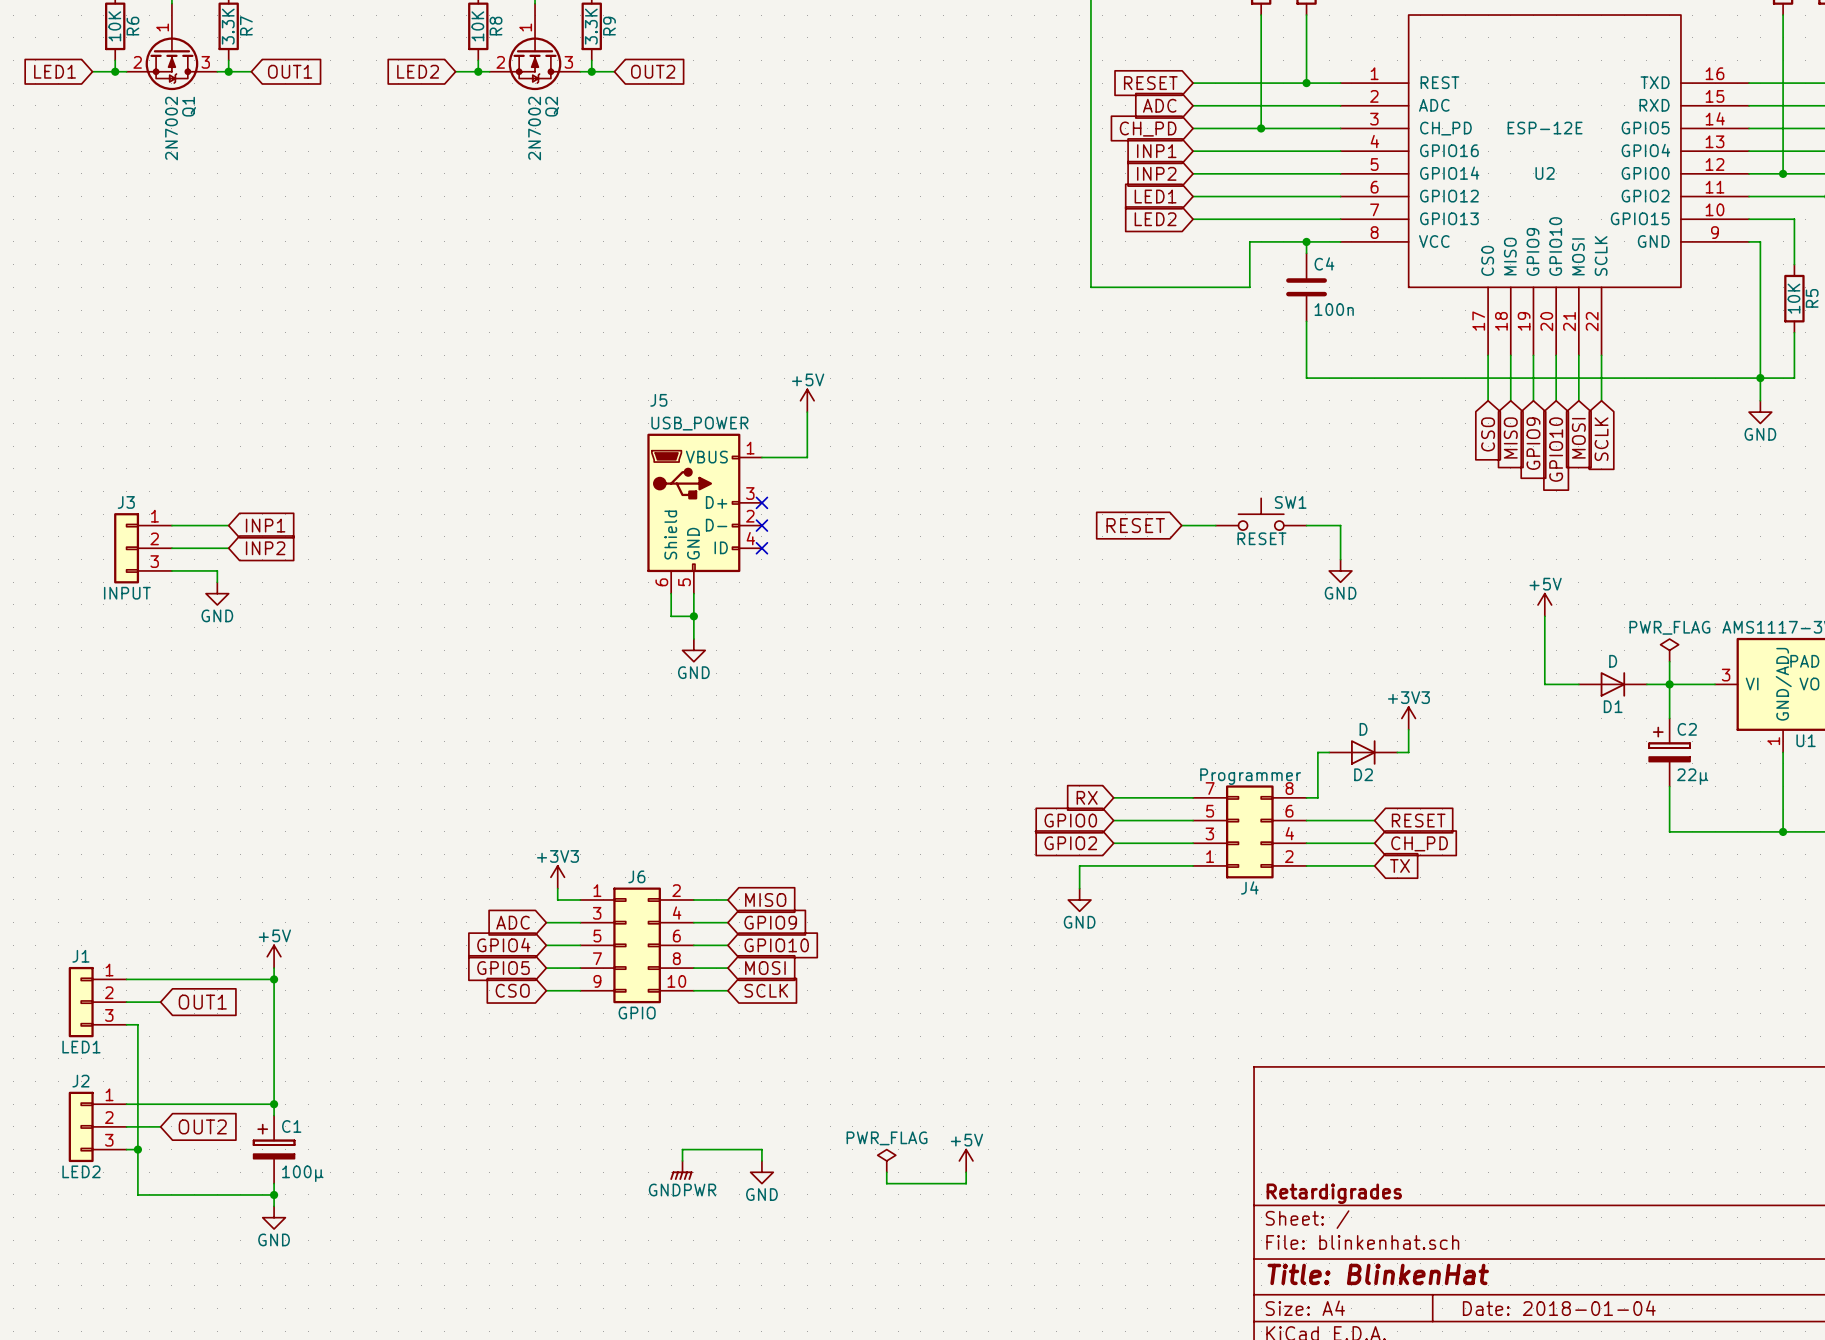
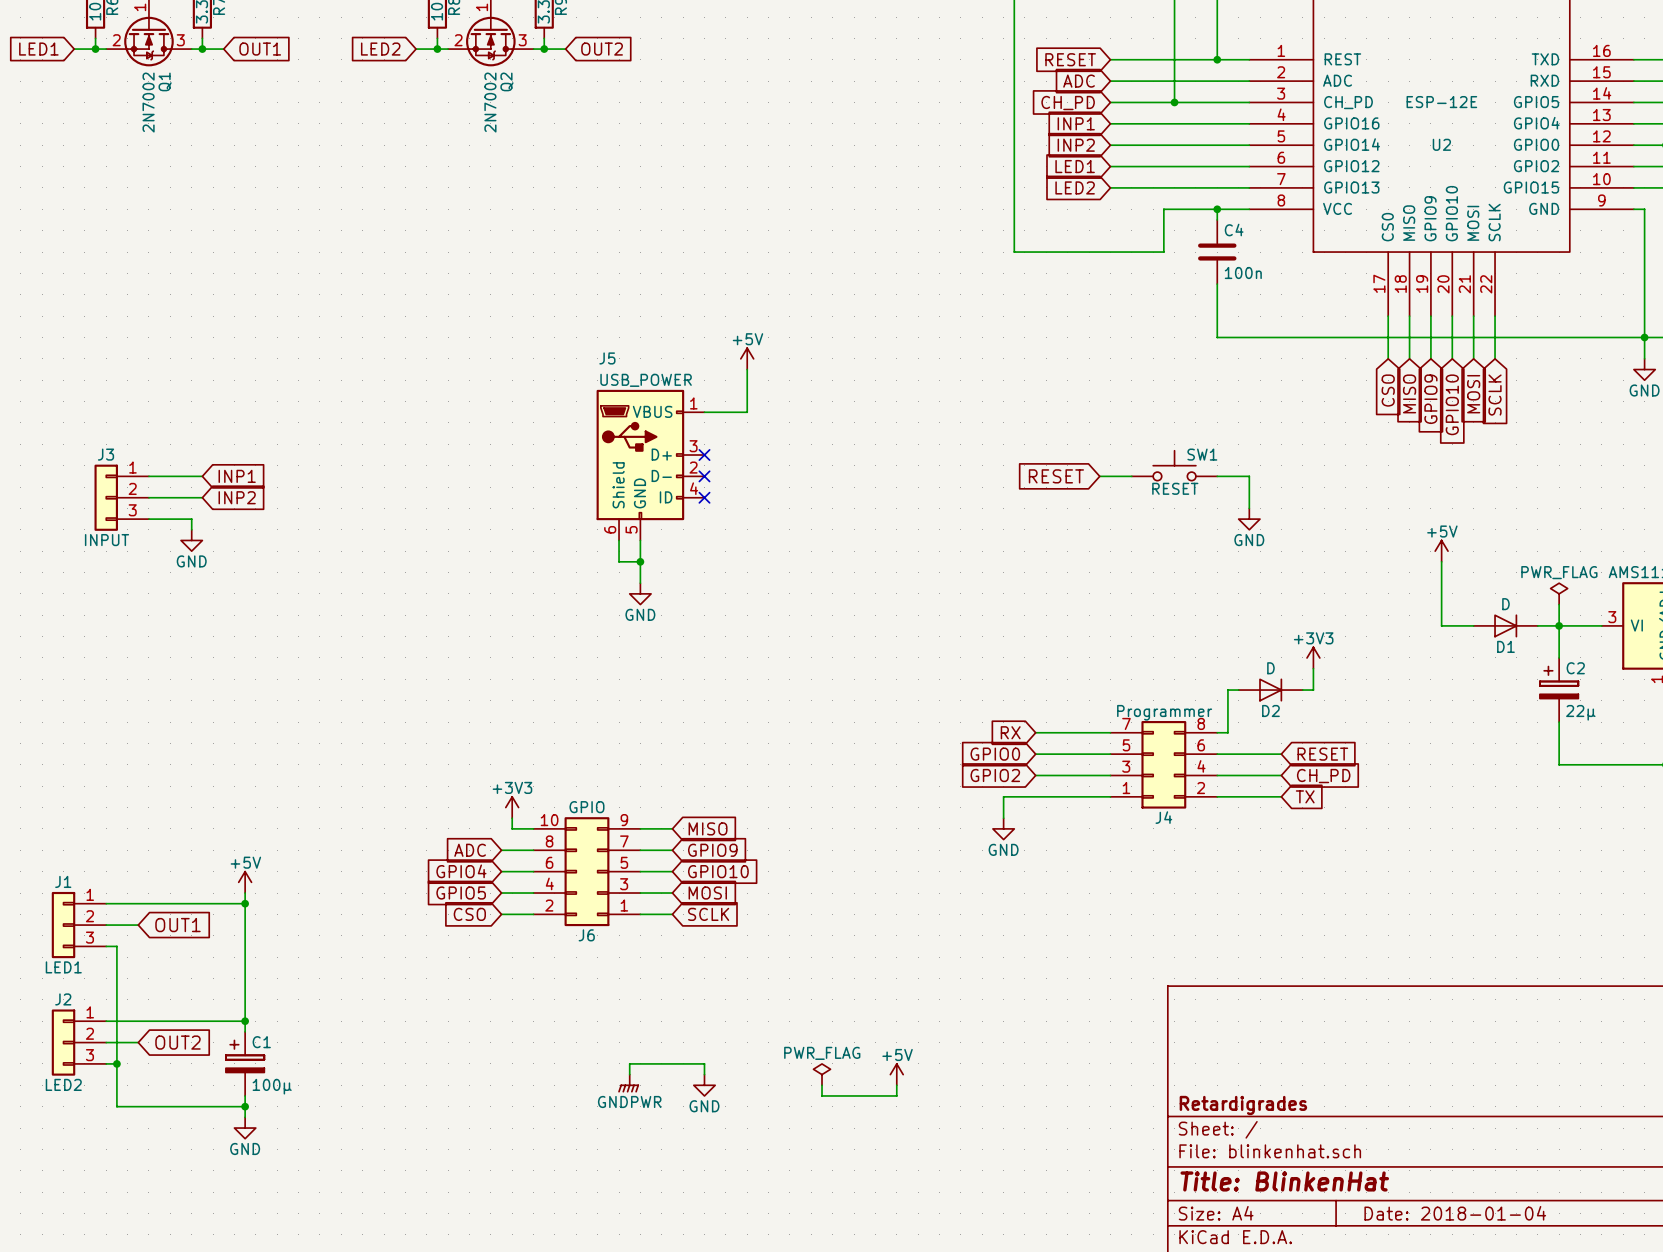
J6 rotation: 0° (637, 945) -> 180° (586, 871)

